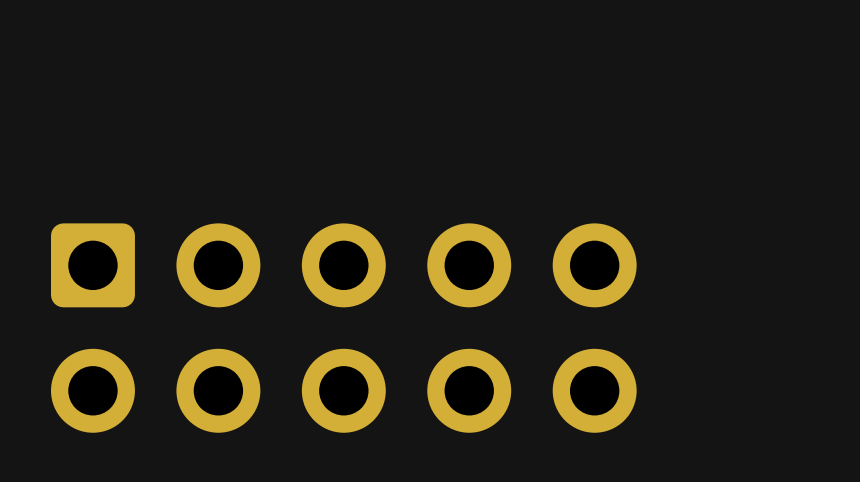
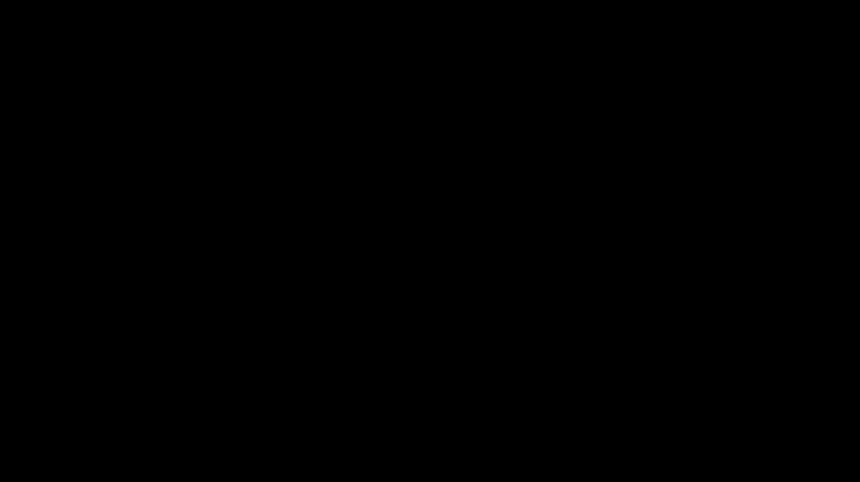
part: (343, 328) -> none

